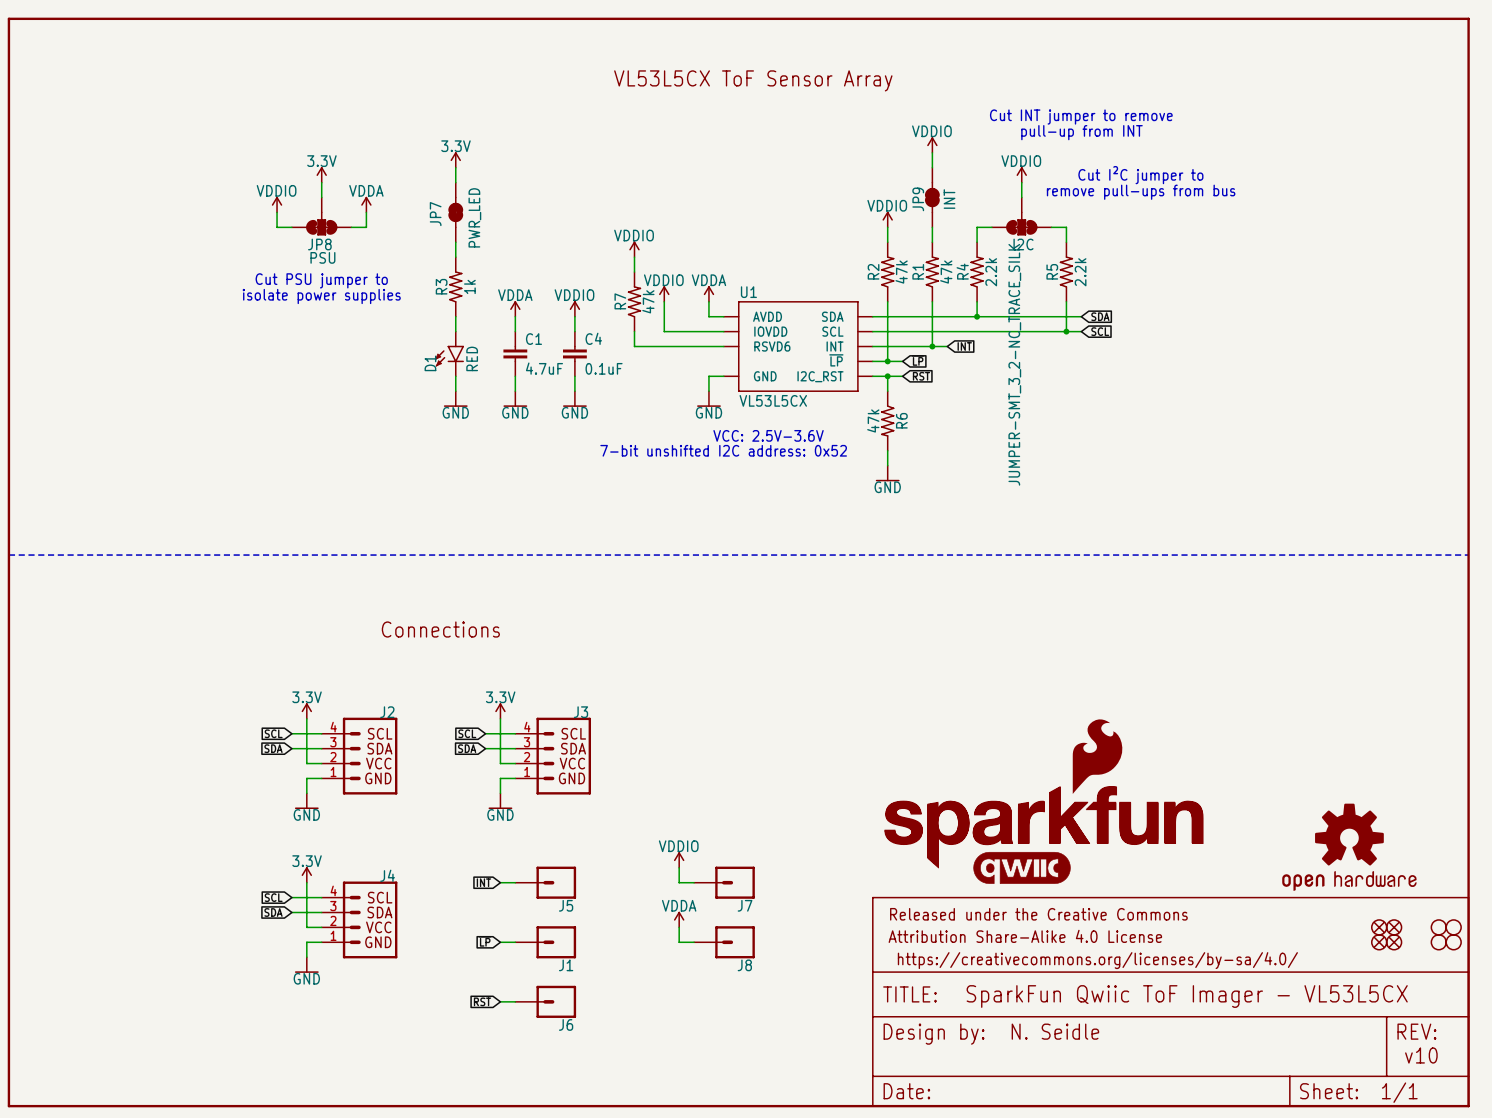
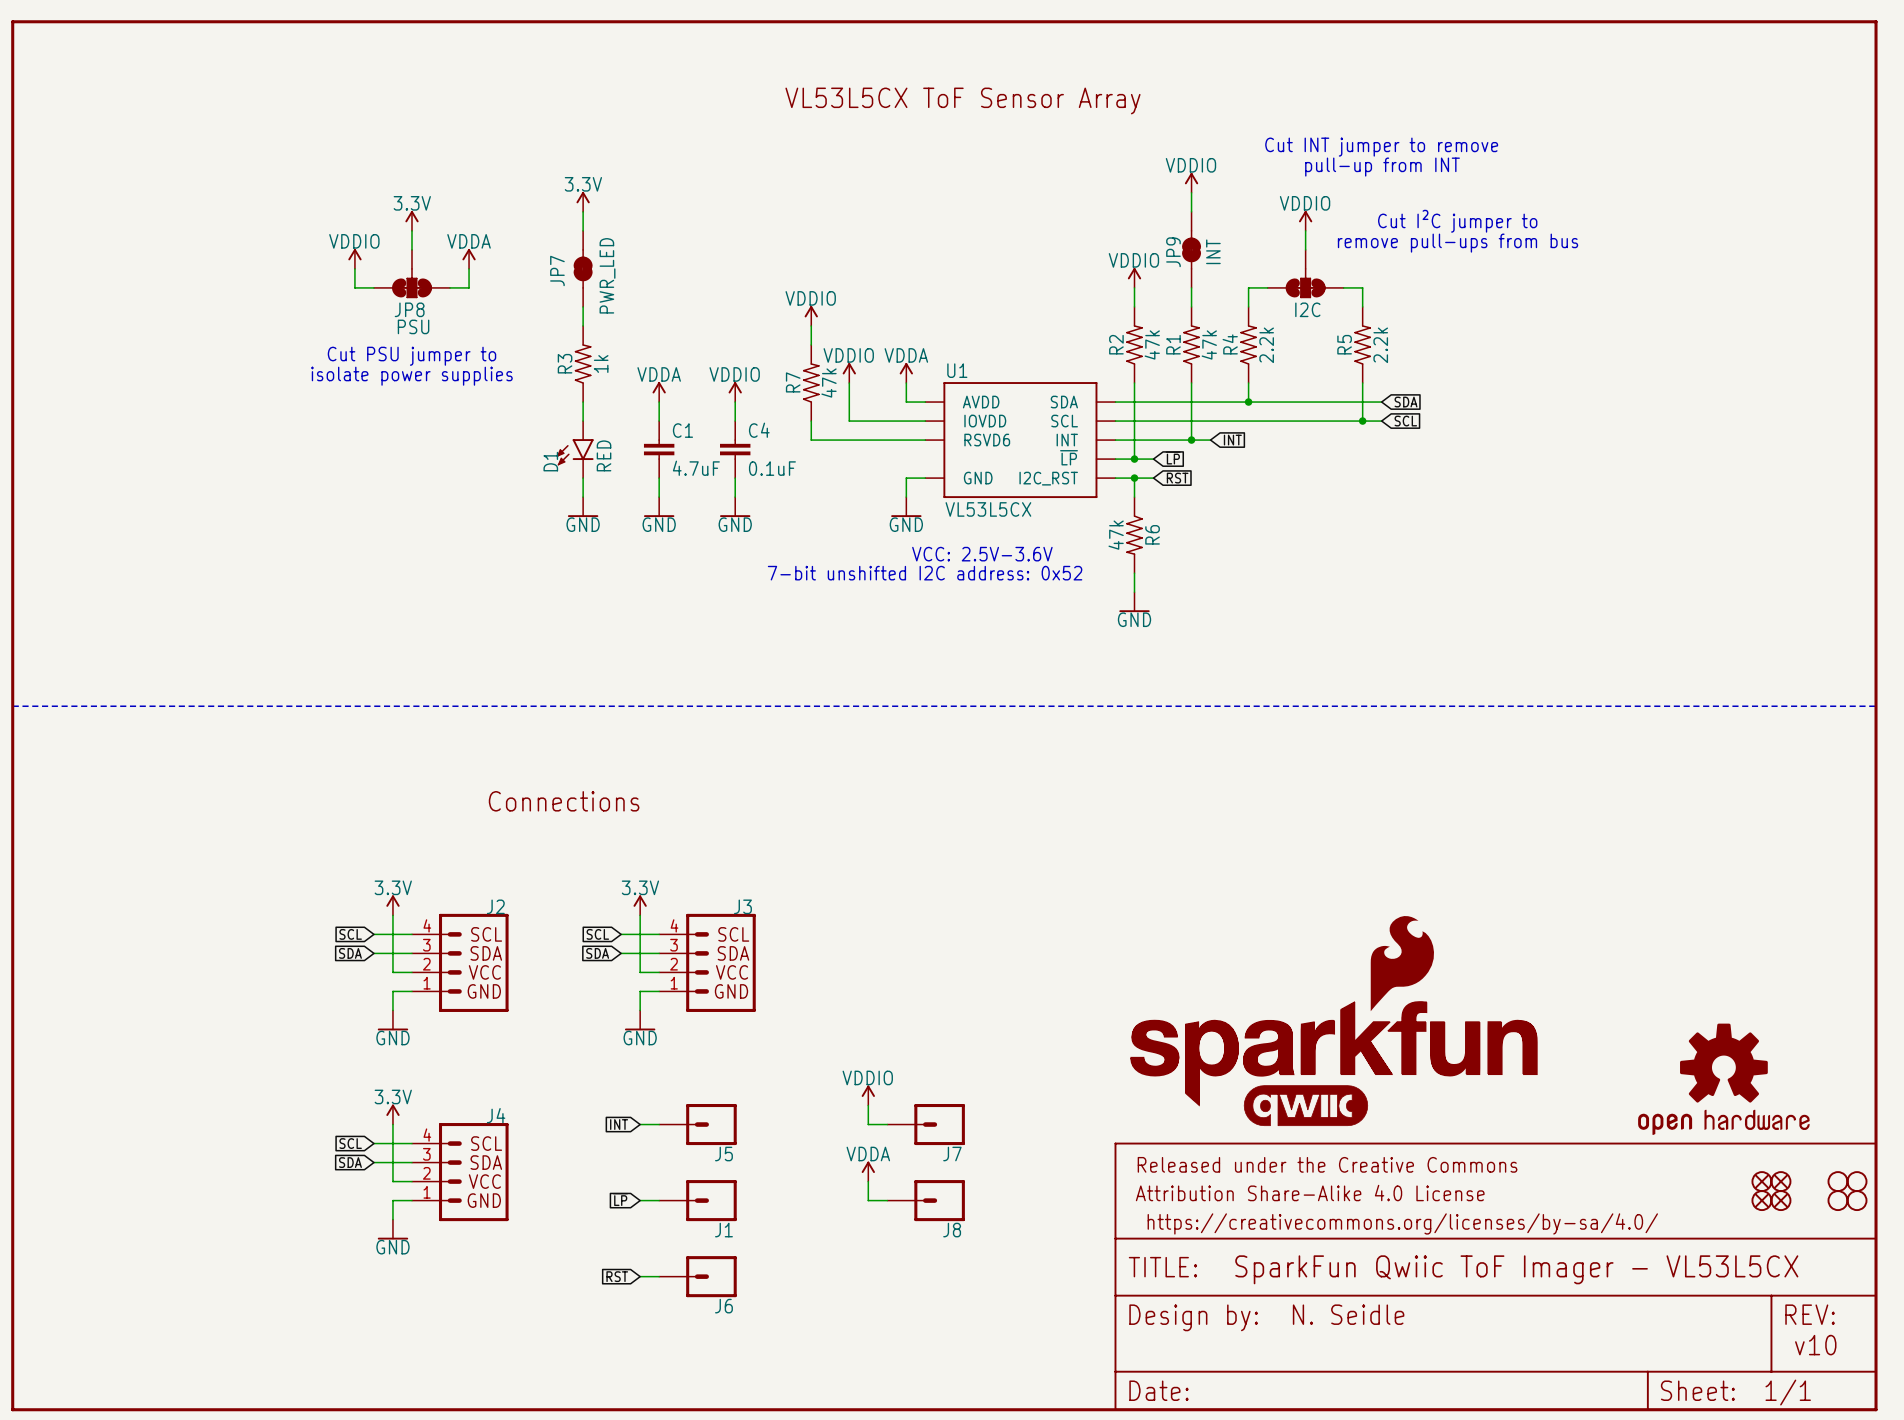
I2C value: JUMPER-SMT_3_2-NC_TRACE_SILK (1014, 364) -> none

